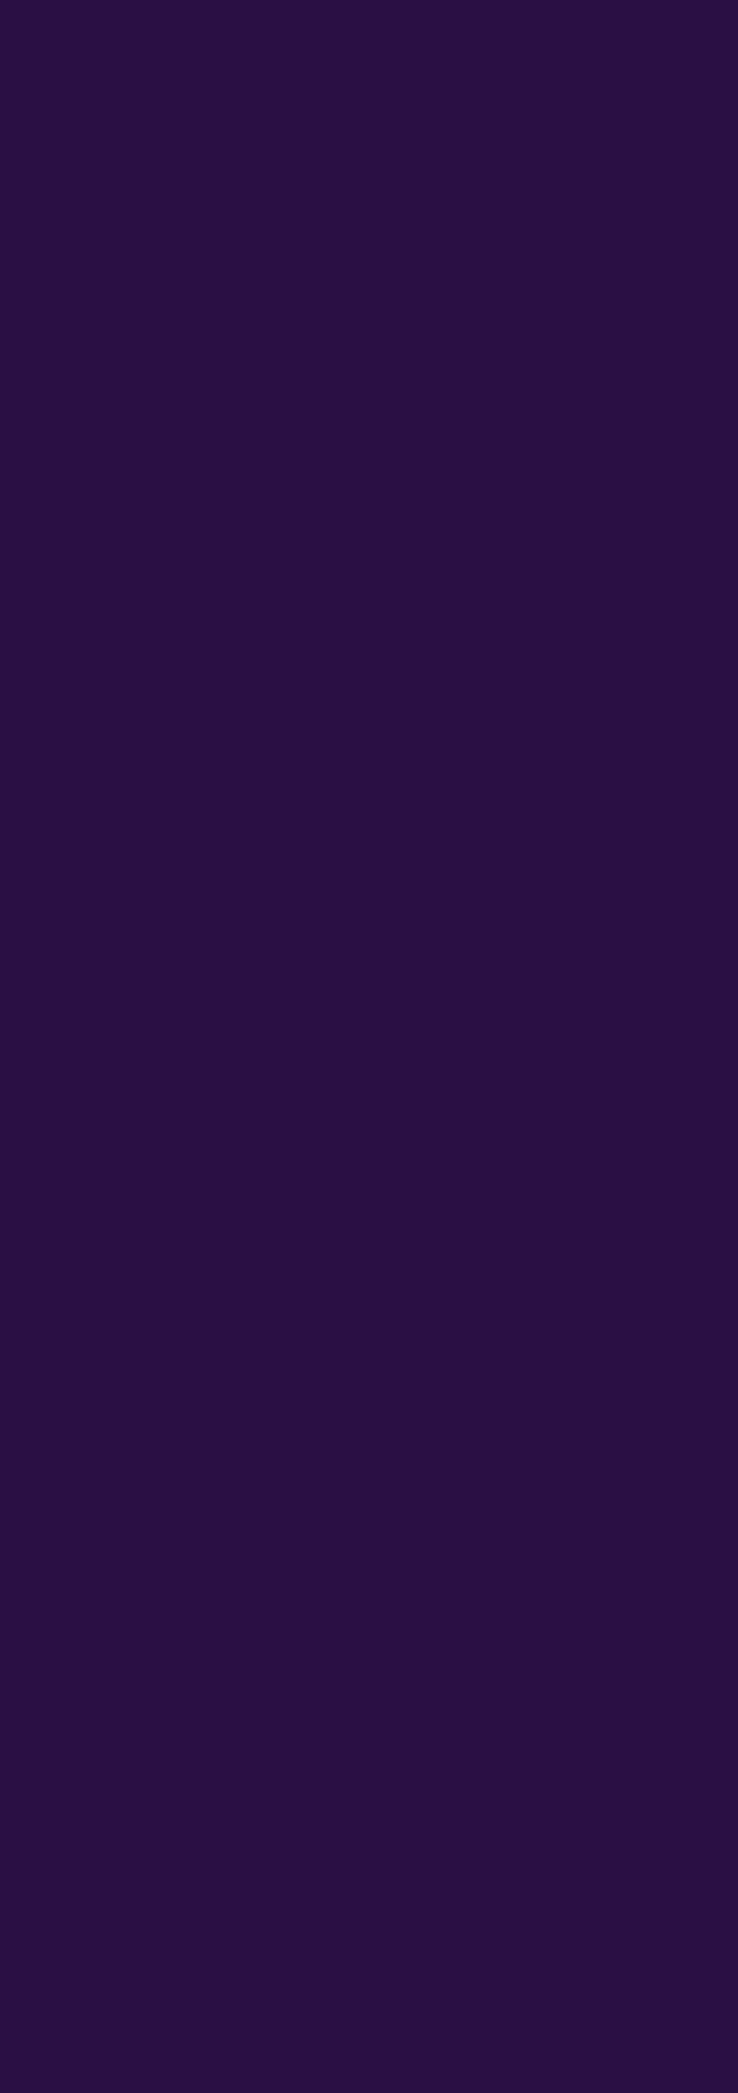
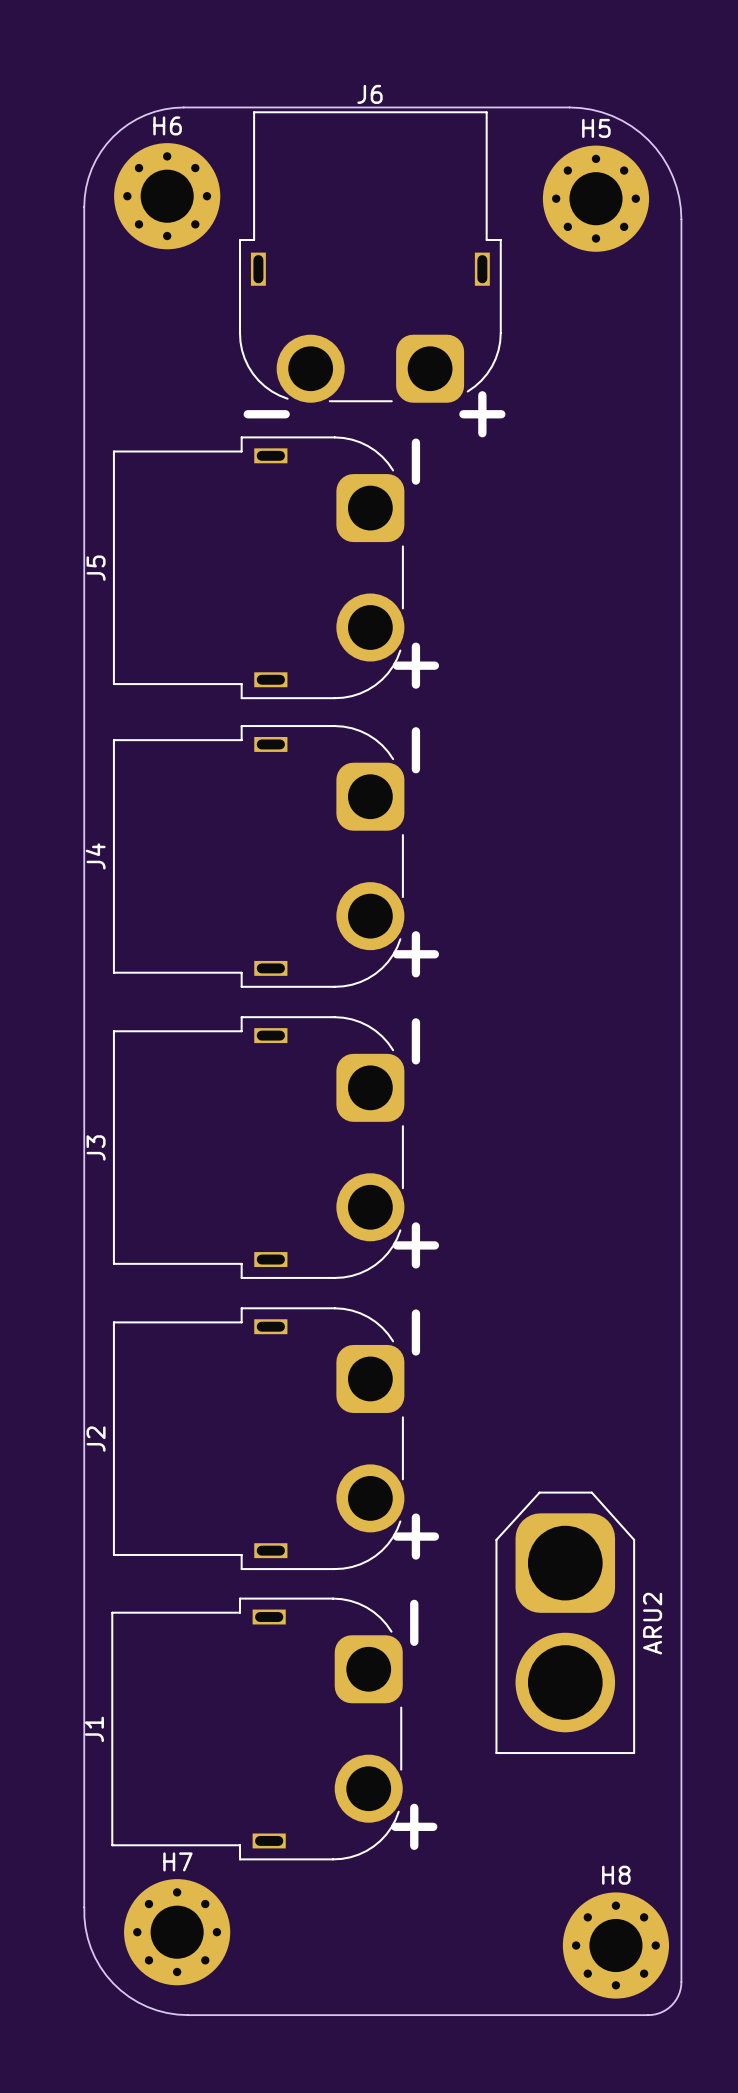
board edge: none -> (183, 107) (569, 107) (591, 109) (622, 120) (648, 140) (668, 166) (679, 197) (681, 219) (681, 1981) (679, 1992) (674, 2002) (665, 2010) (655, 2014) (177, 2014) (147, 2006) (120, 1990) (100, 1966) (87, 1938) (84, 1907) (84, 197) (88, 178) (95, 160) (113, 136) (128, 124) (145, 115) (164, 109) (183, 107)
H6: none -> (167, 196)
H5: none -> (595, 198)
J6: none -> (370, 257)
J5: none -> (258, 567)
J4: none -> (258, 856)
J3: none -> (258, 1147)
J2: none -> (258, 1438)
ARU2: none -> (565, 1622)
J1: none -> (257, 1728)
H7: none -> (177, 1932)
H8: none -> (615, 1945)

